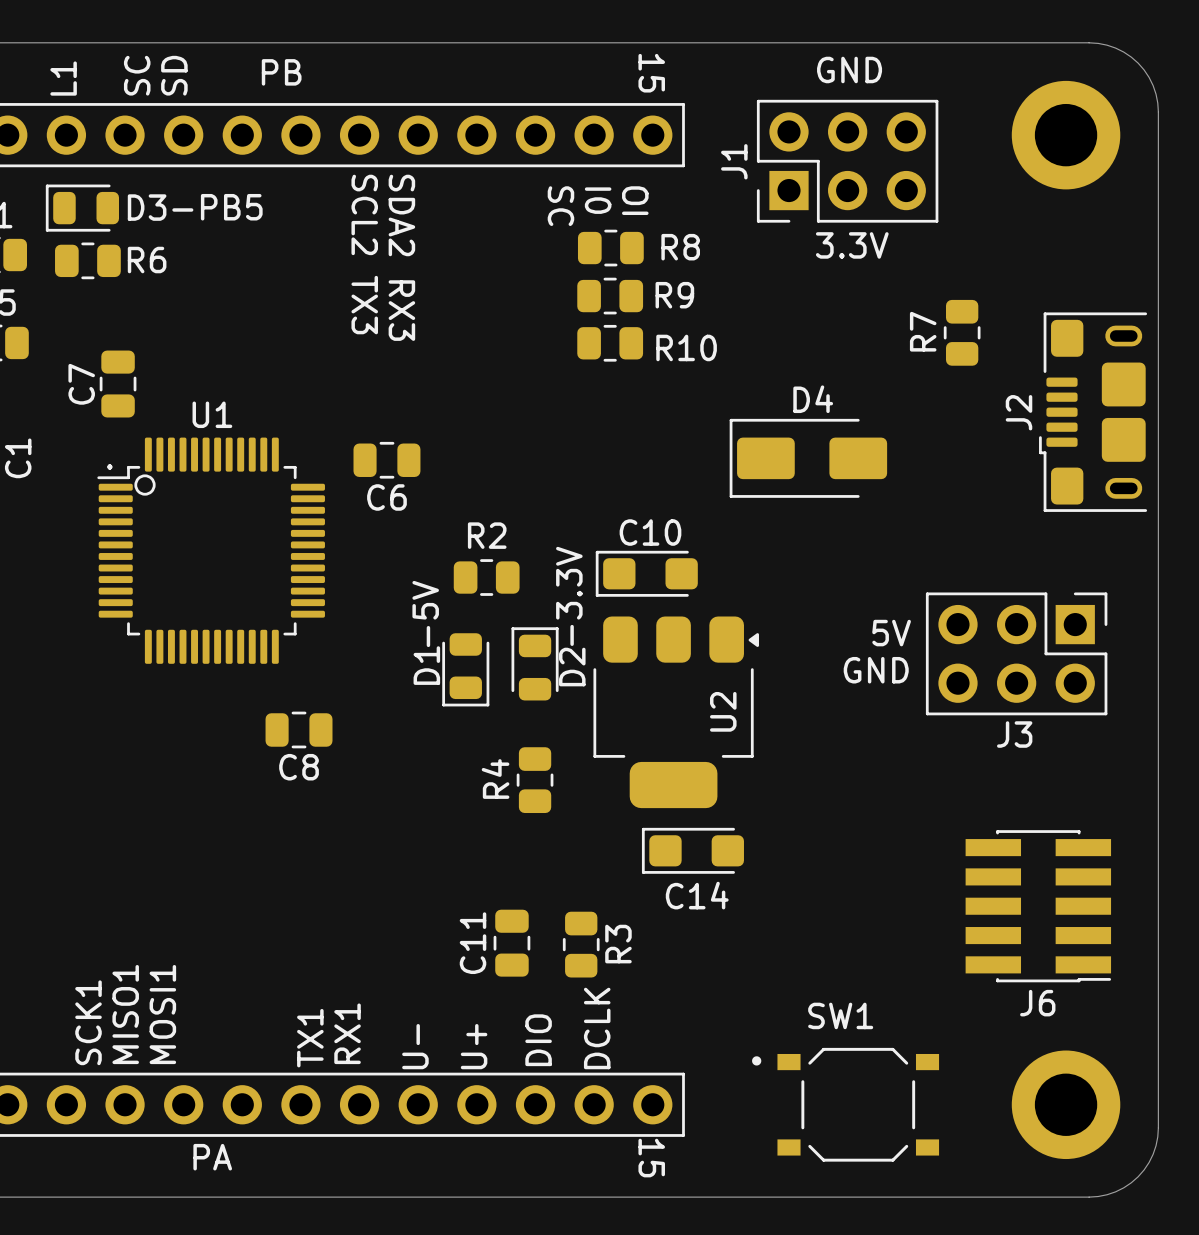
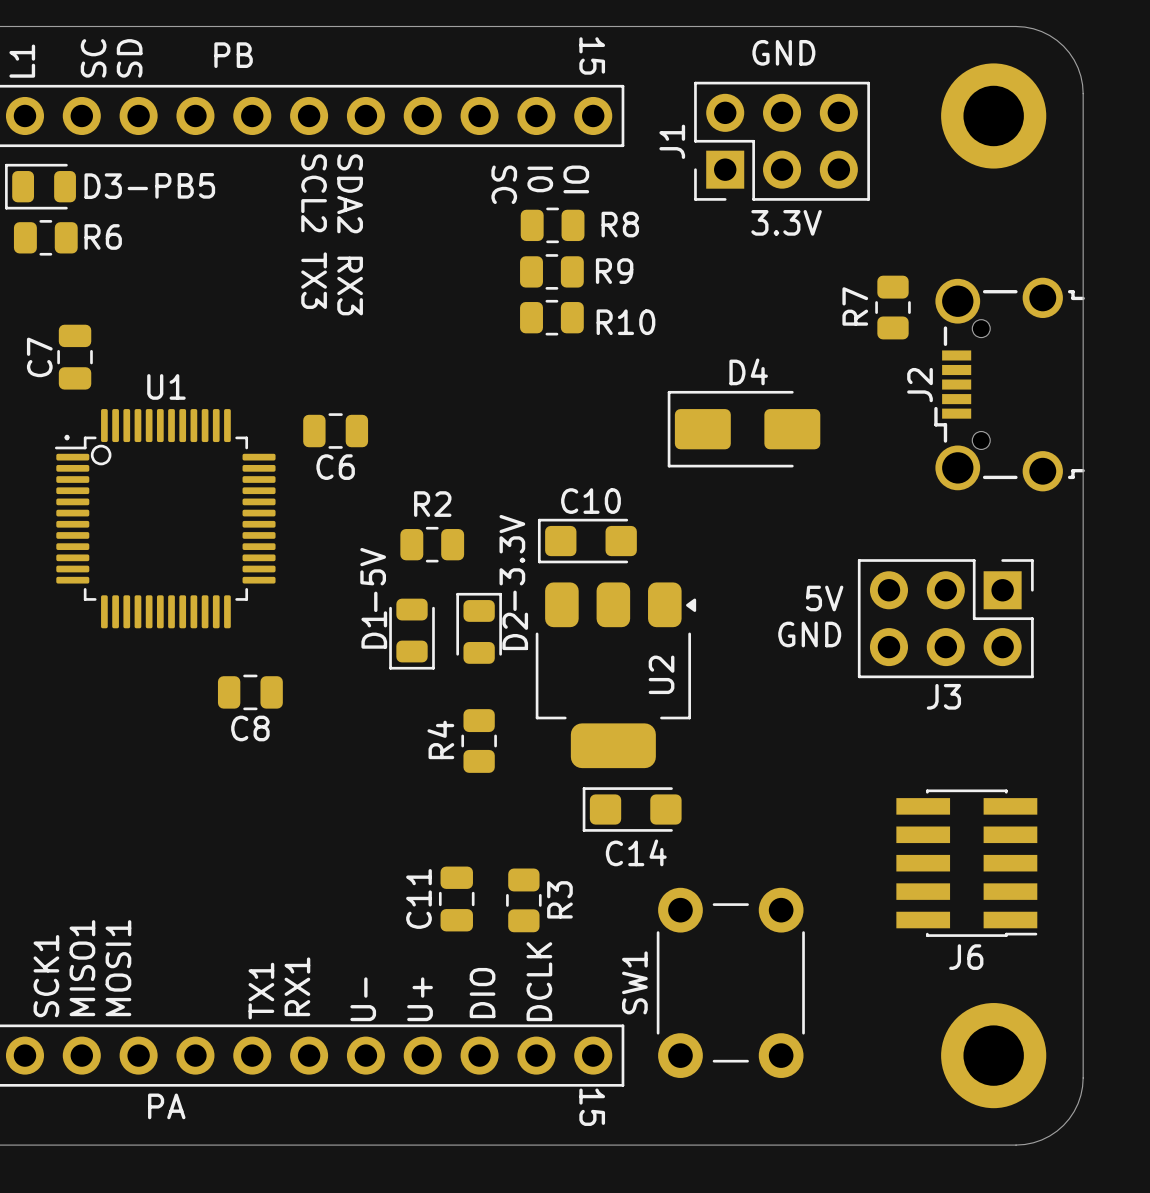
J2 footprint: [1039, 312, 1148, 512] -> [934, 277, 1085, 492]
SW1 name position: SW1 (840, 1015) -> SW1 (634, 982)
SW1 footprint: [752, 1047, 940, 1162] -> [656, 887, 805, 1078]

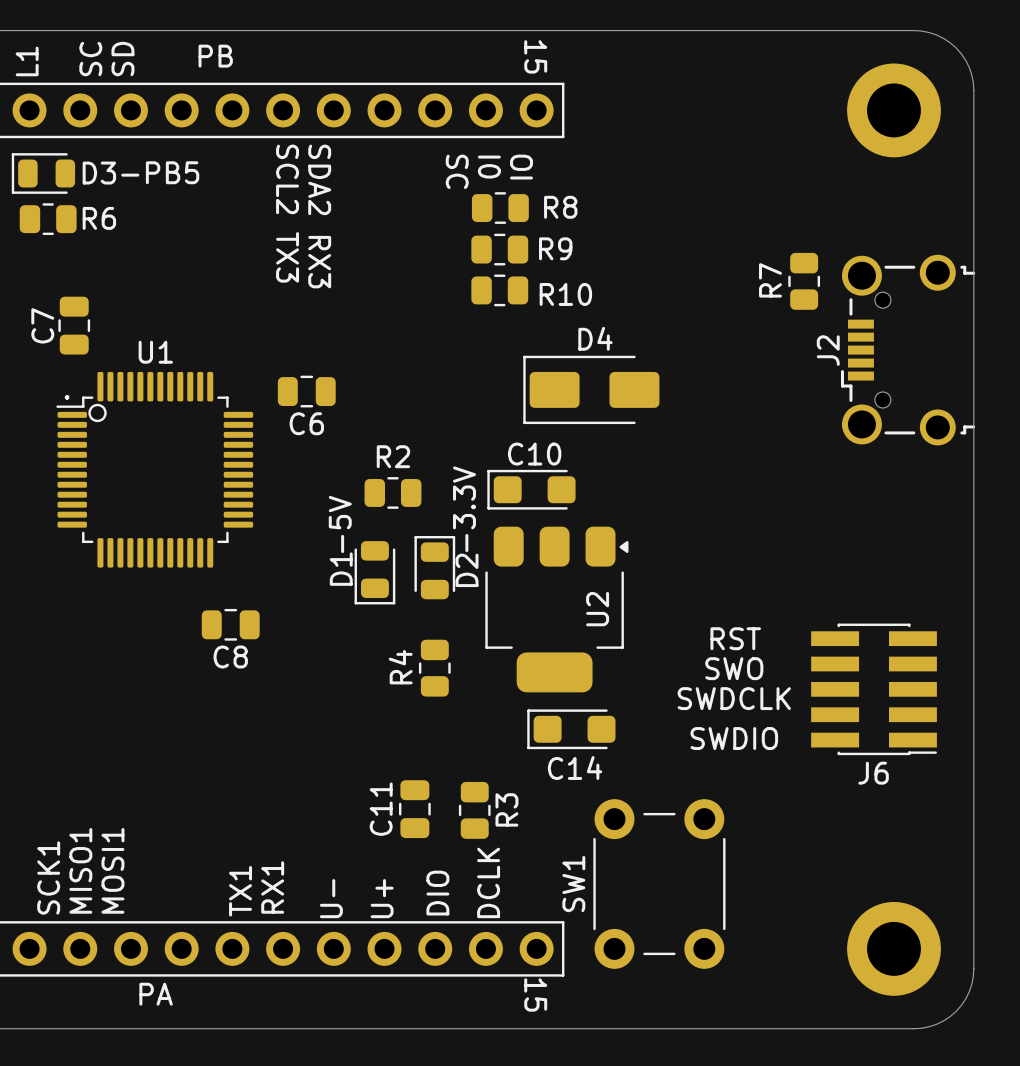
text: GND (783, 52) -> none
J1: (782, 141) -> none
text: 3.3V (786, 222) -> none
D4 position: (744, 429) -> (591, 389)
text: 5V (824, 598) -> none
J3: (945, 618) -> none
text: GND (809, 634) -> none
text: none -> RST (735, 638)
text: none -> SWO (734, 668)
text: none -> SWDCLK (734, 698)
text: none -> SWDIO (734, 738)
J6 position: (966, 863) -> (874, 689)

